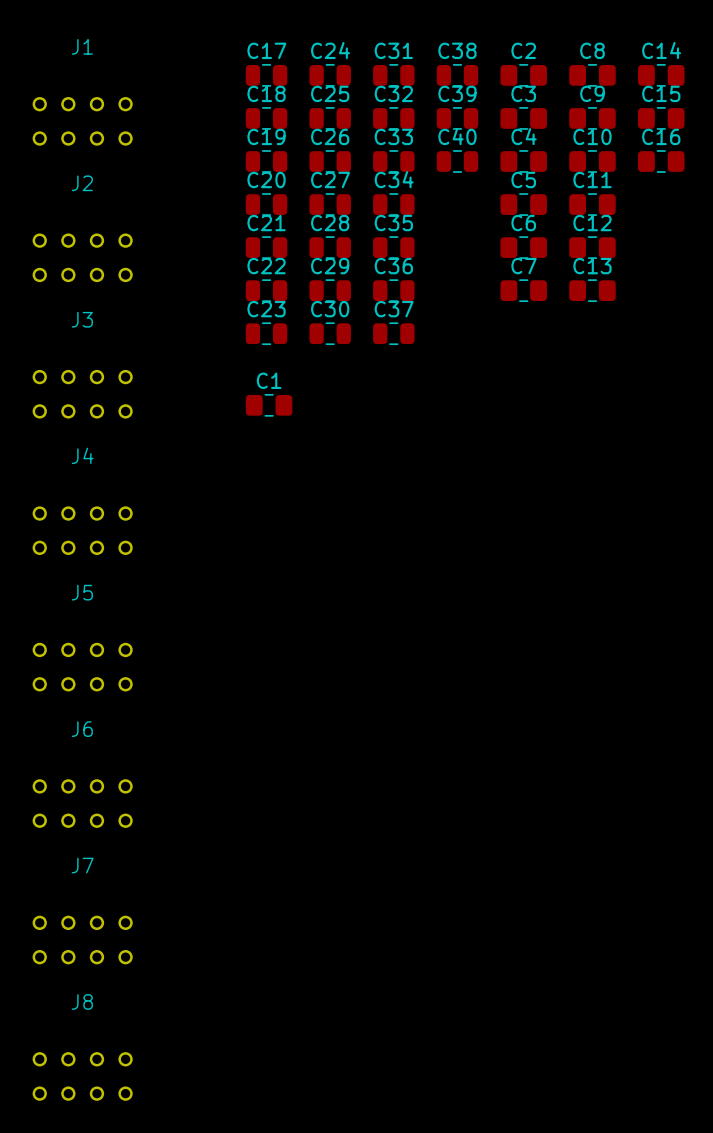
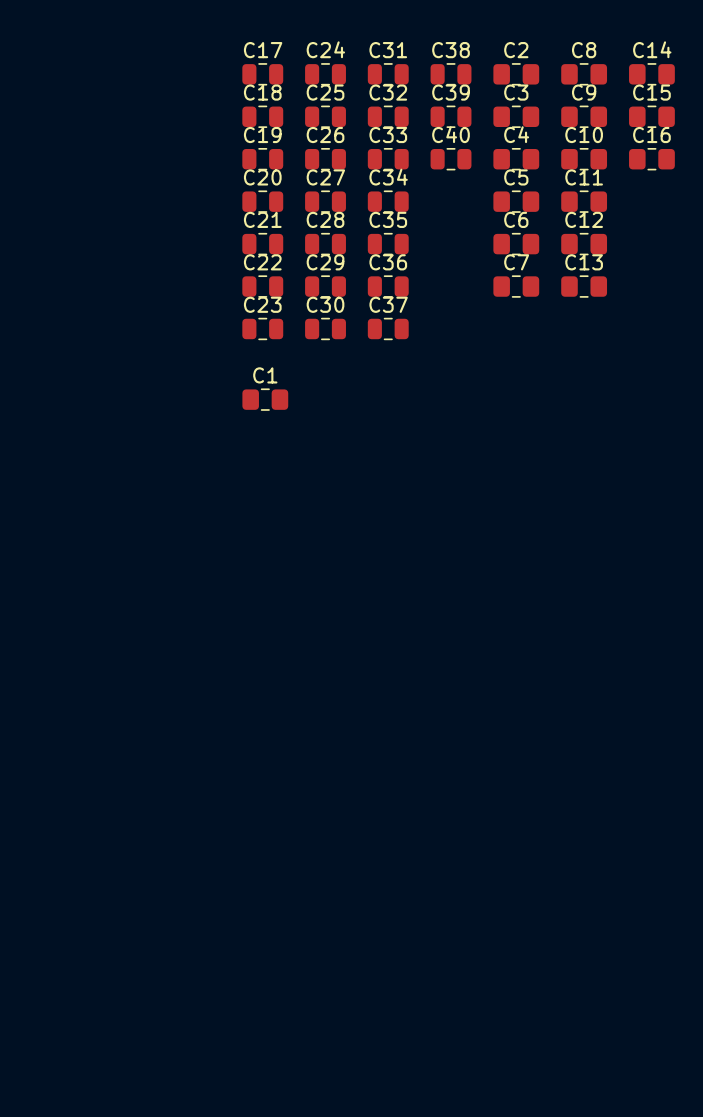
J1: (82, 121) -> none
J2: (82, 257) -> none
J3: (82, 394) -> none
J4: (82, 530) -> none
J5: (82, 667) -> none
J6: (82, 803) -> none
J7: (82, 940) -> none
J8: (82, 1076) -> none

